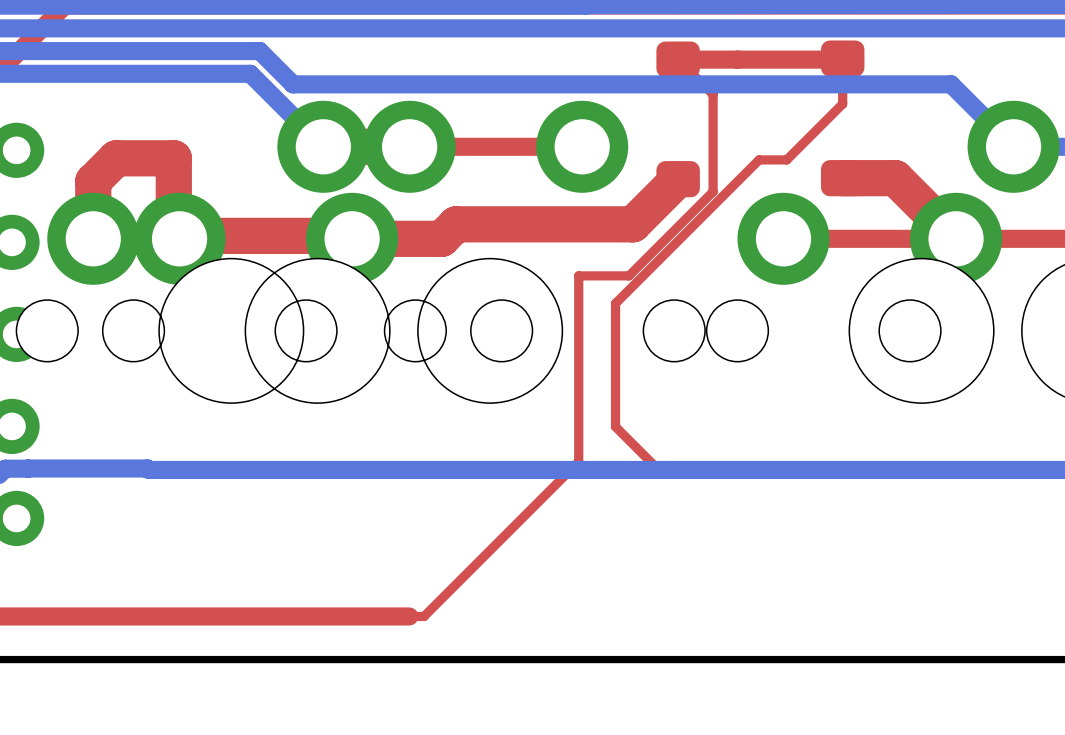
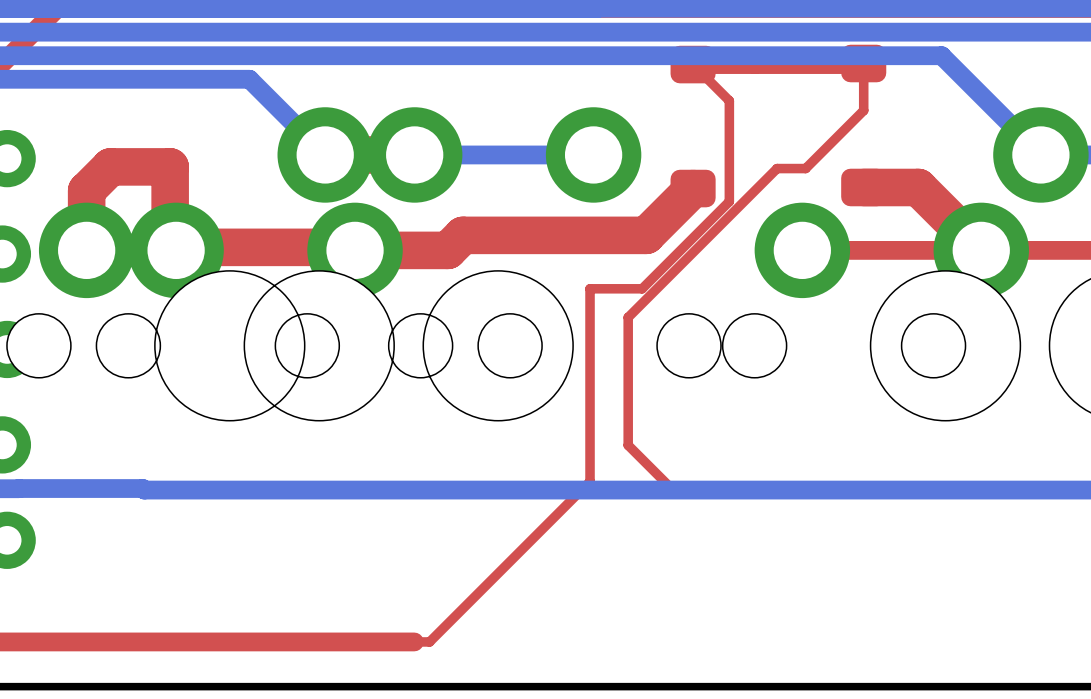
bottom track: (259, 51) (293, 84) (951, 84) -> (259, 55) (941, 55) (976, 90)
top track: (582, 146) (409, 146) -> none
bottom track: none -> (593, 154) (414, 154)

